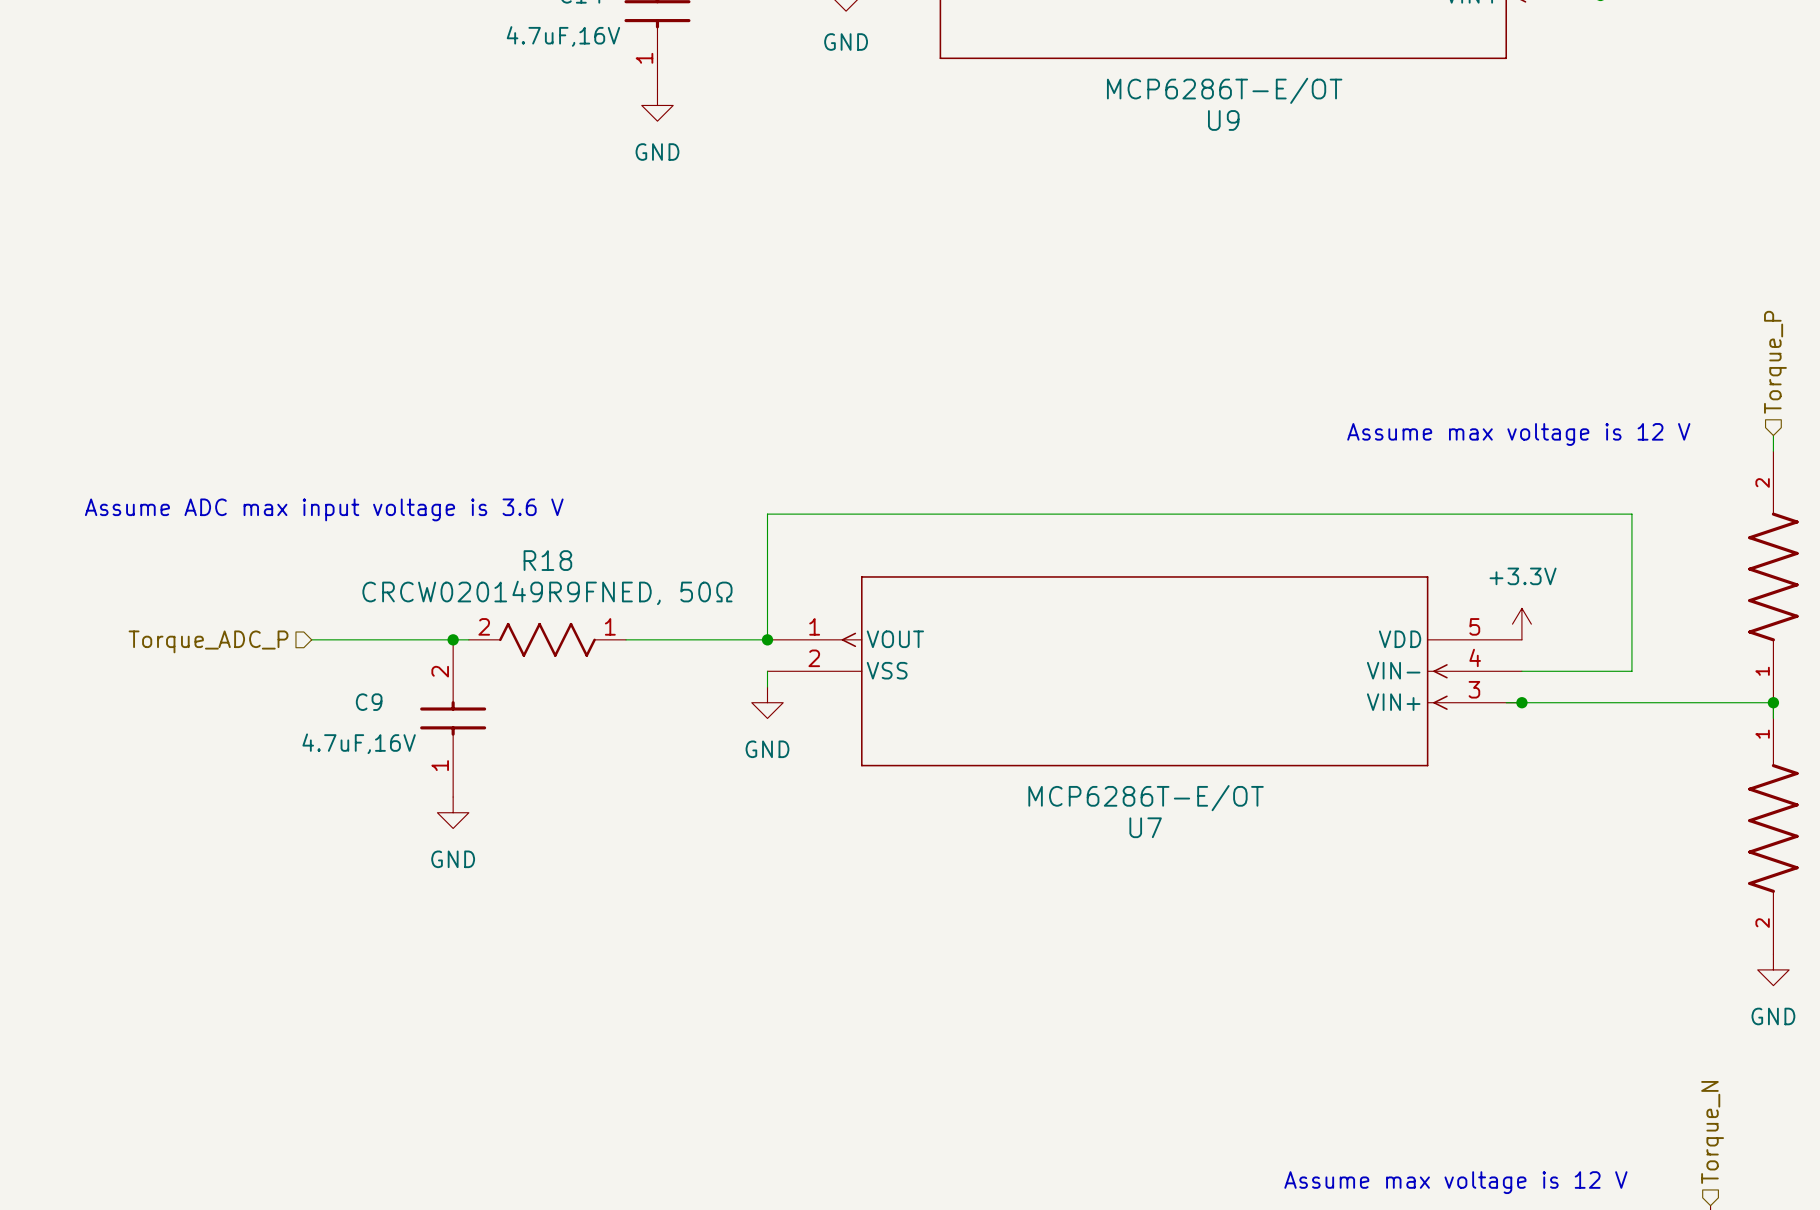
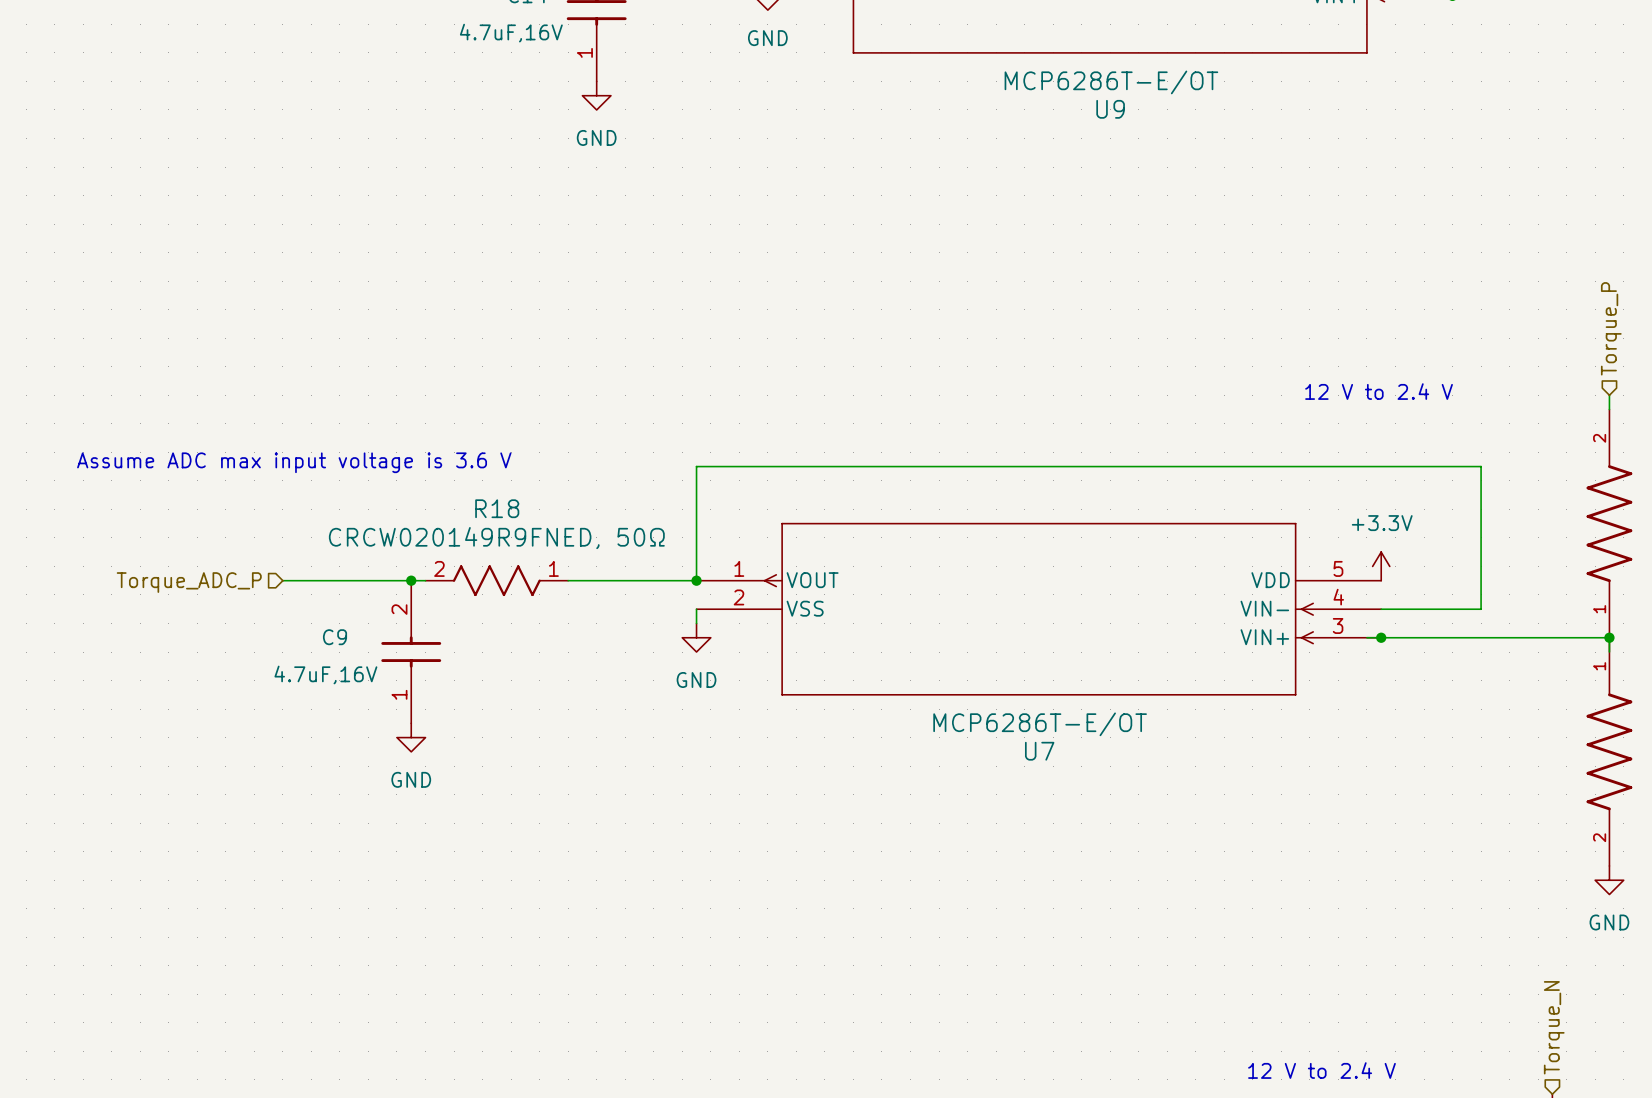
text: Assume max voltage is 12 V (1518, 434) -> 12 V to 2.4 V (1379, 391)
text: Assume max voltage is 12 V (1455, 1182) -> 12 V to 2.4 V (1321, 1070)

